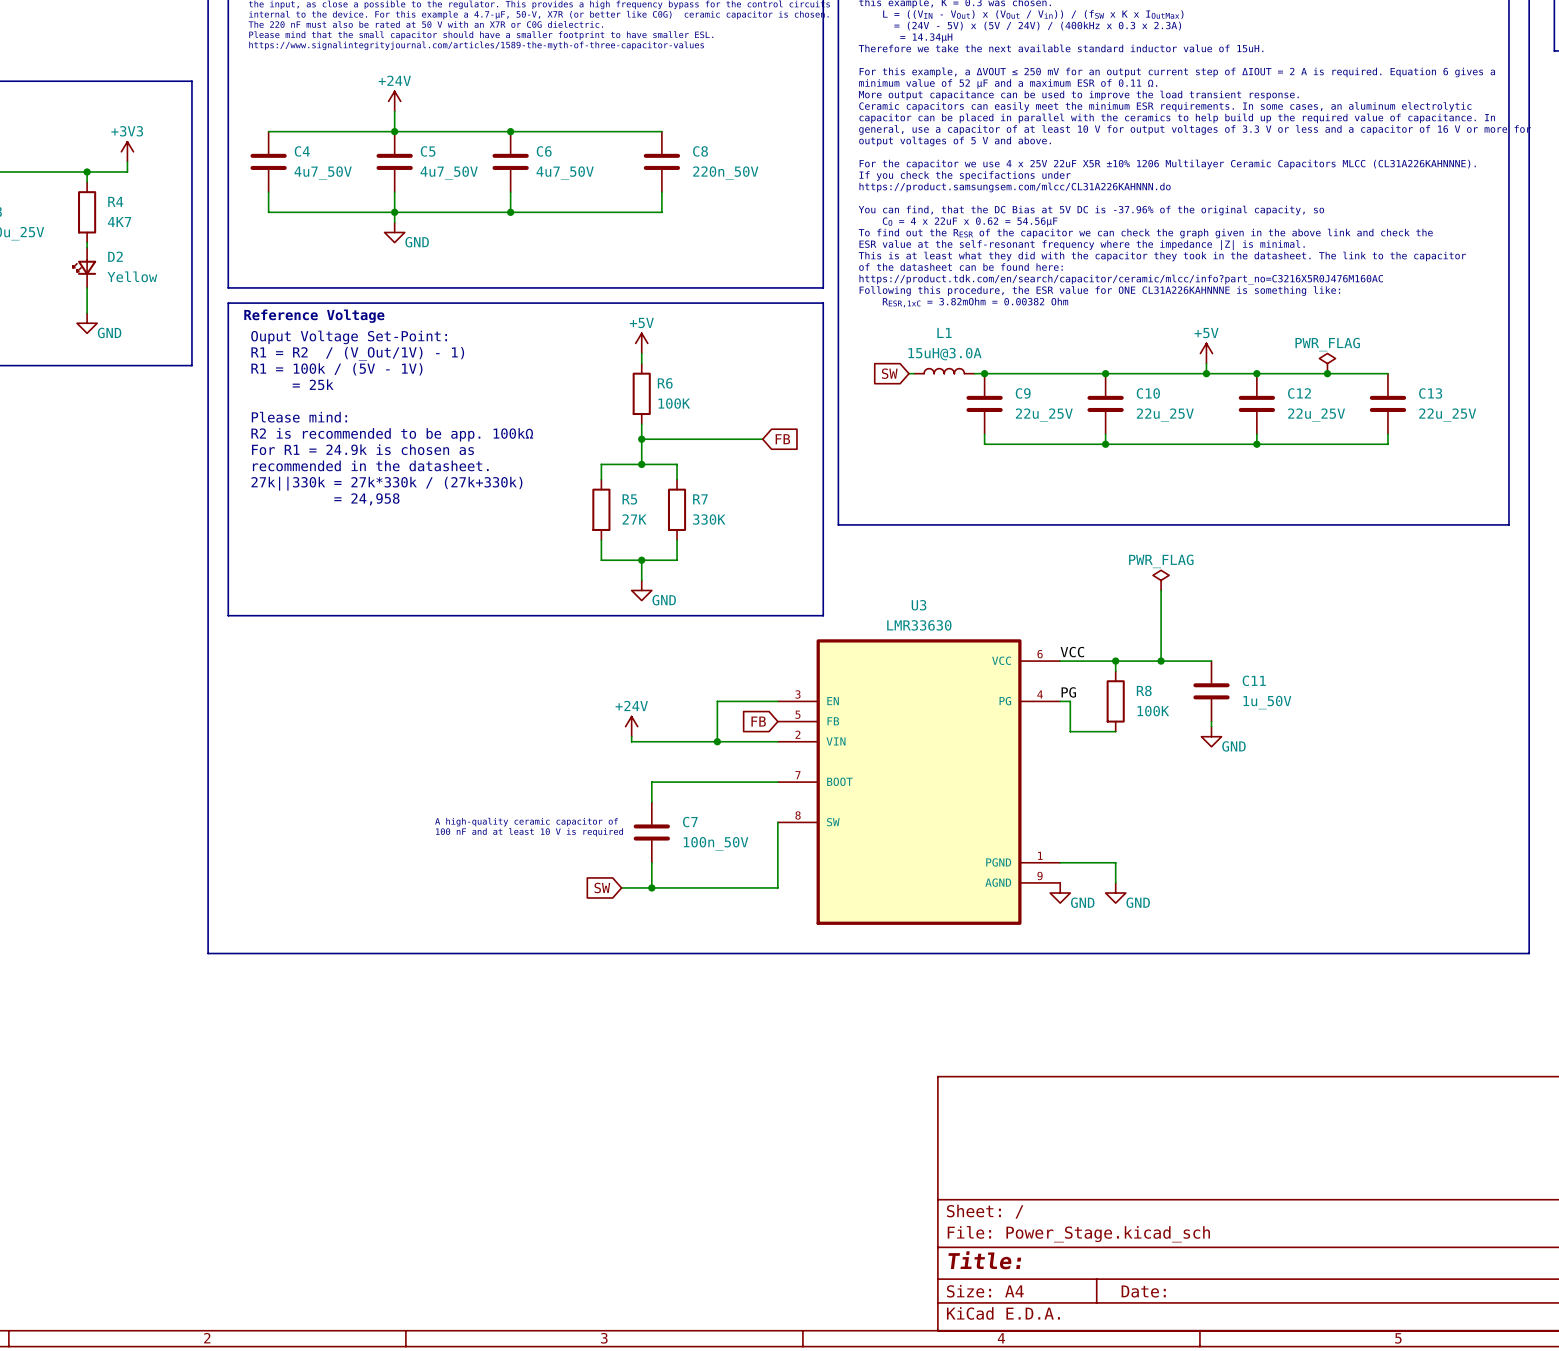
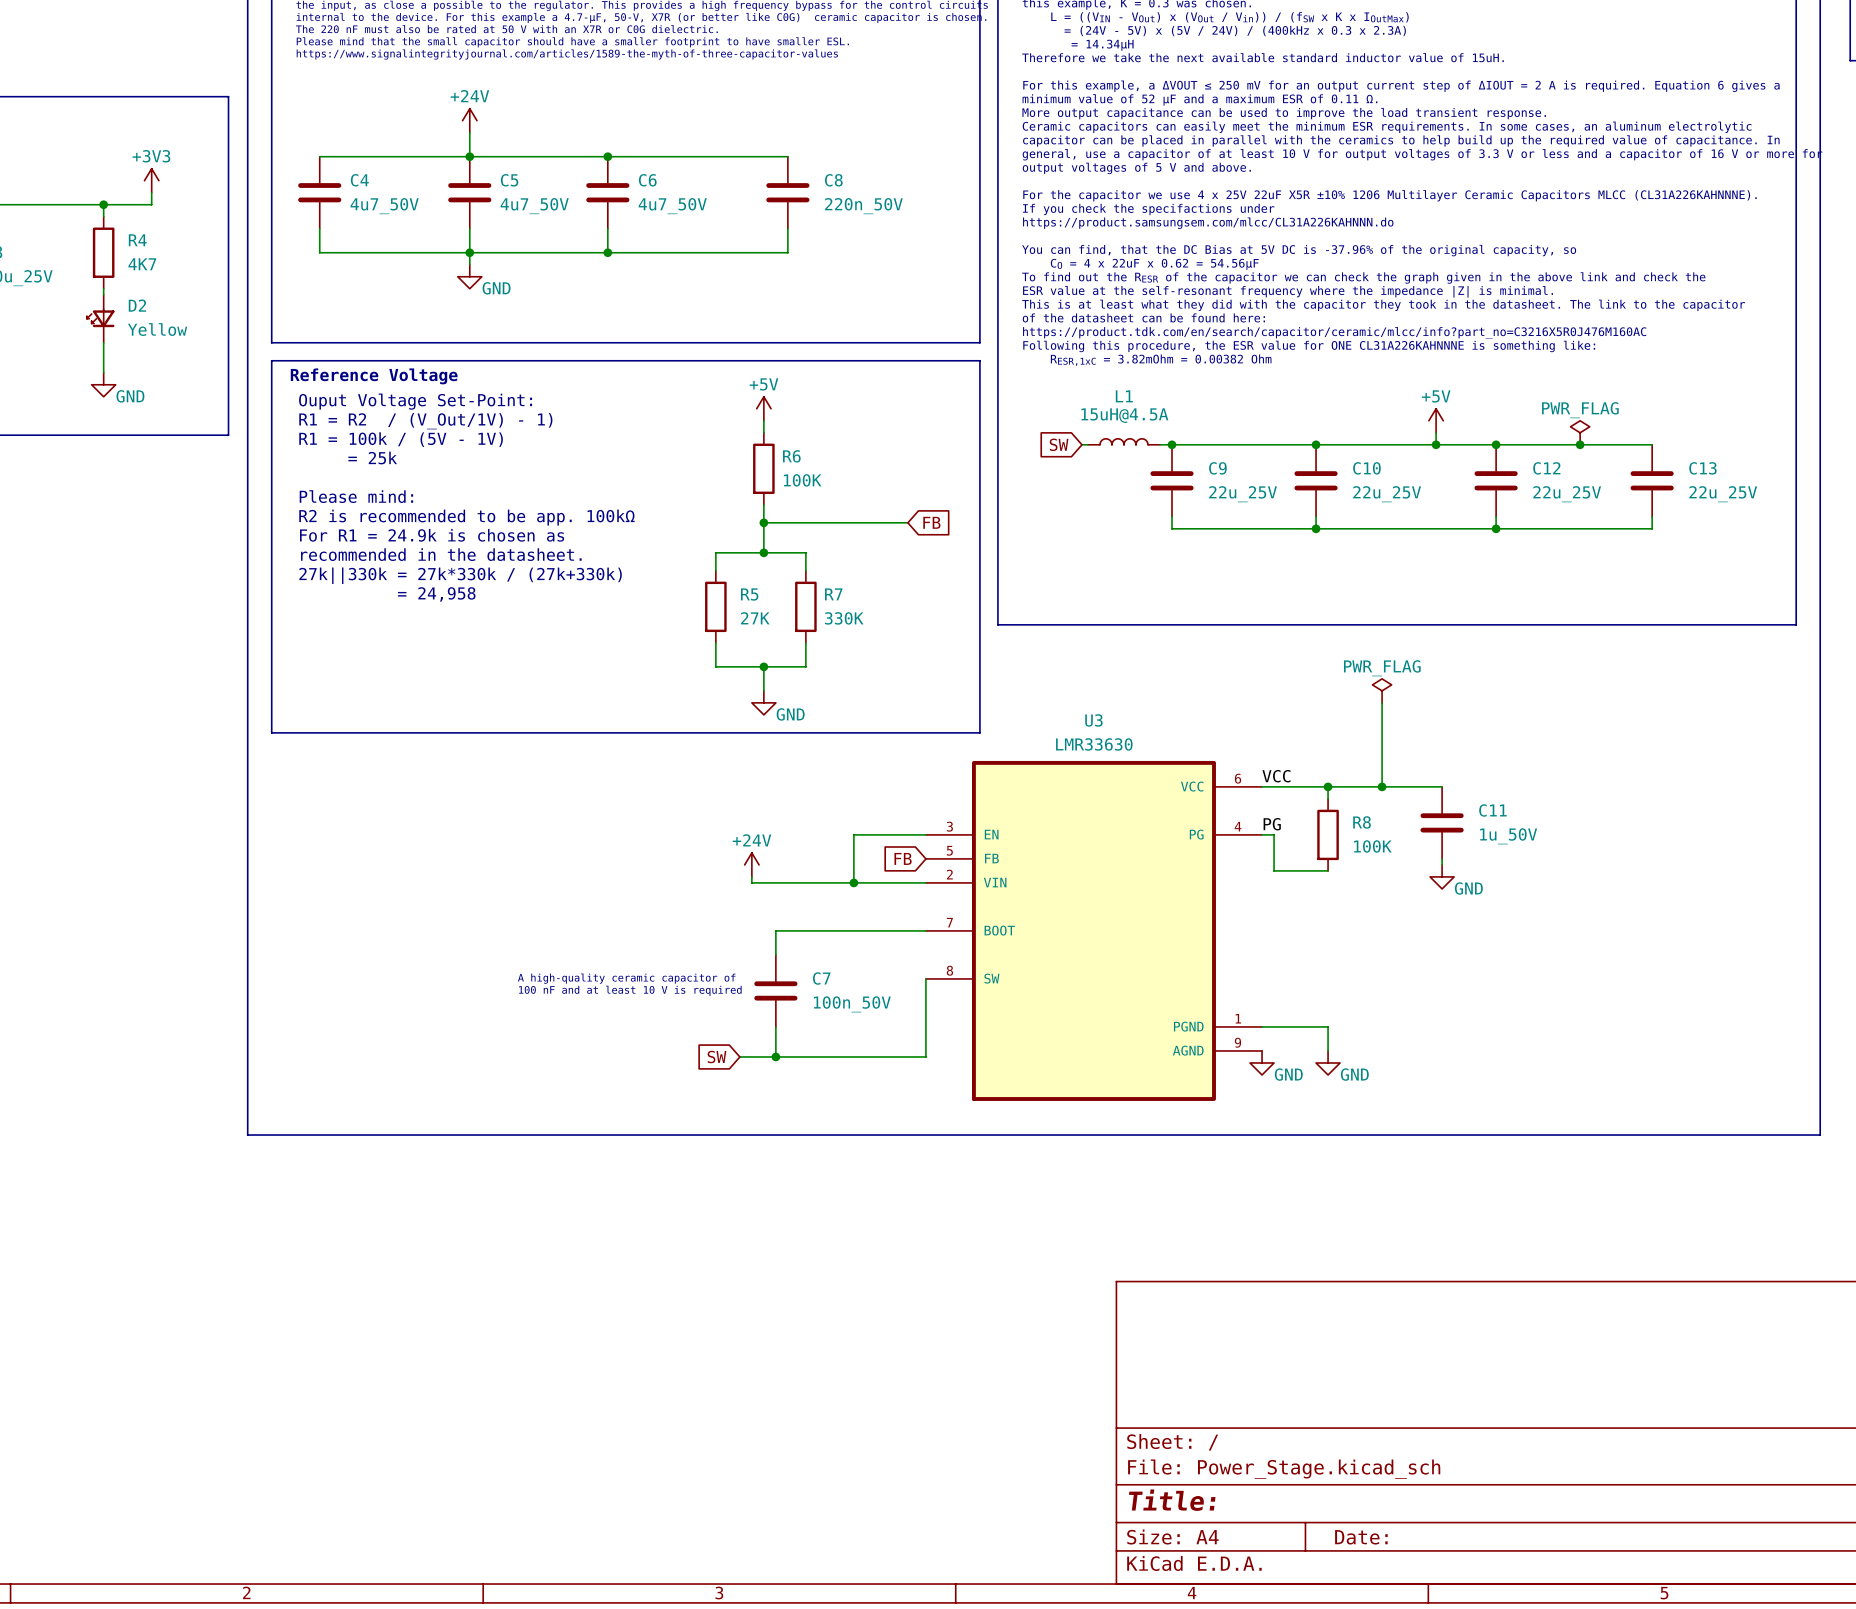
L1 value: 15uH@3.0A (944, 354) -> 15uH@4.5A (1124, 415)

